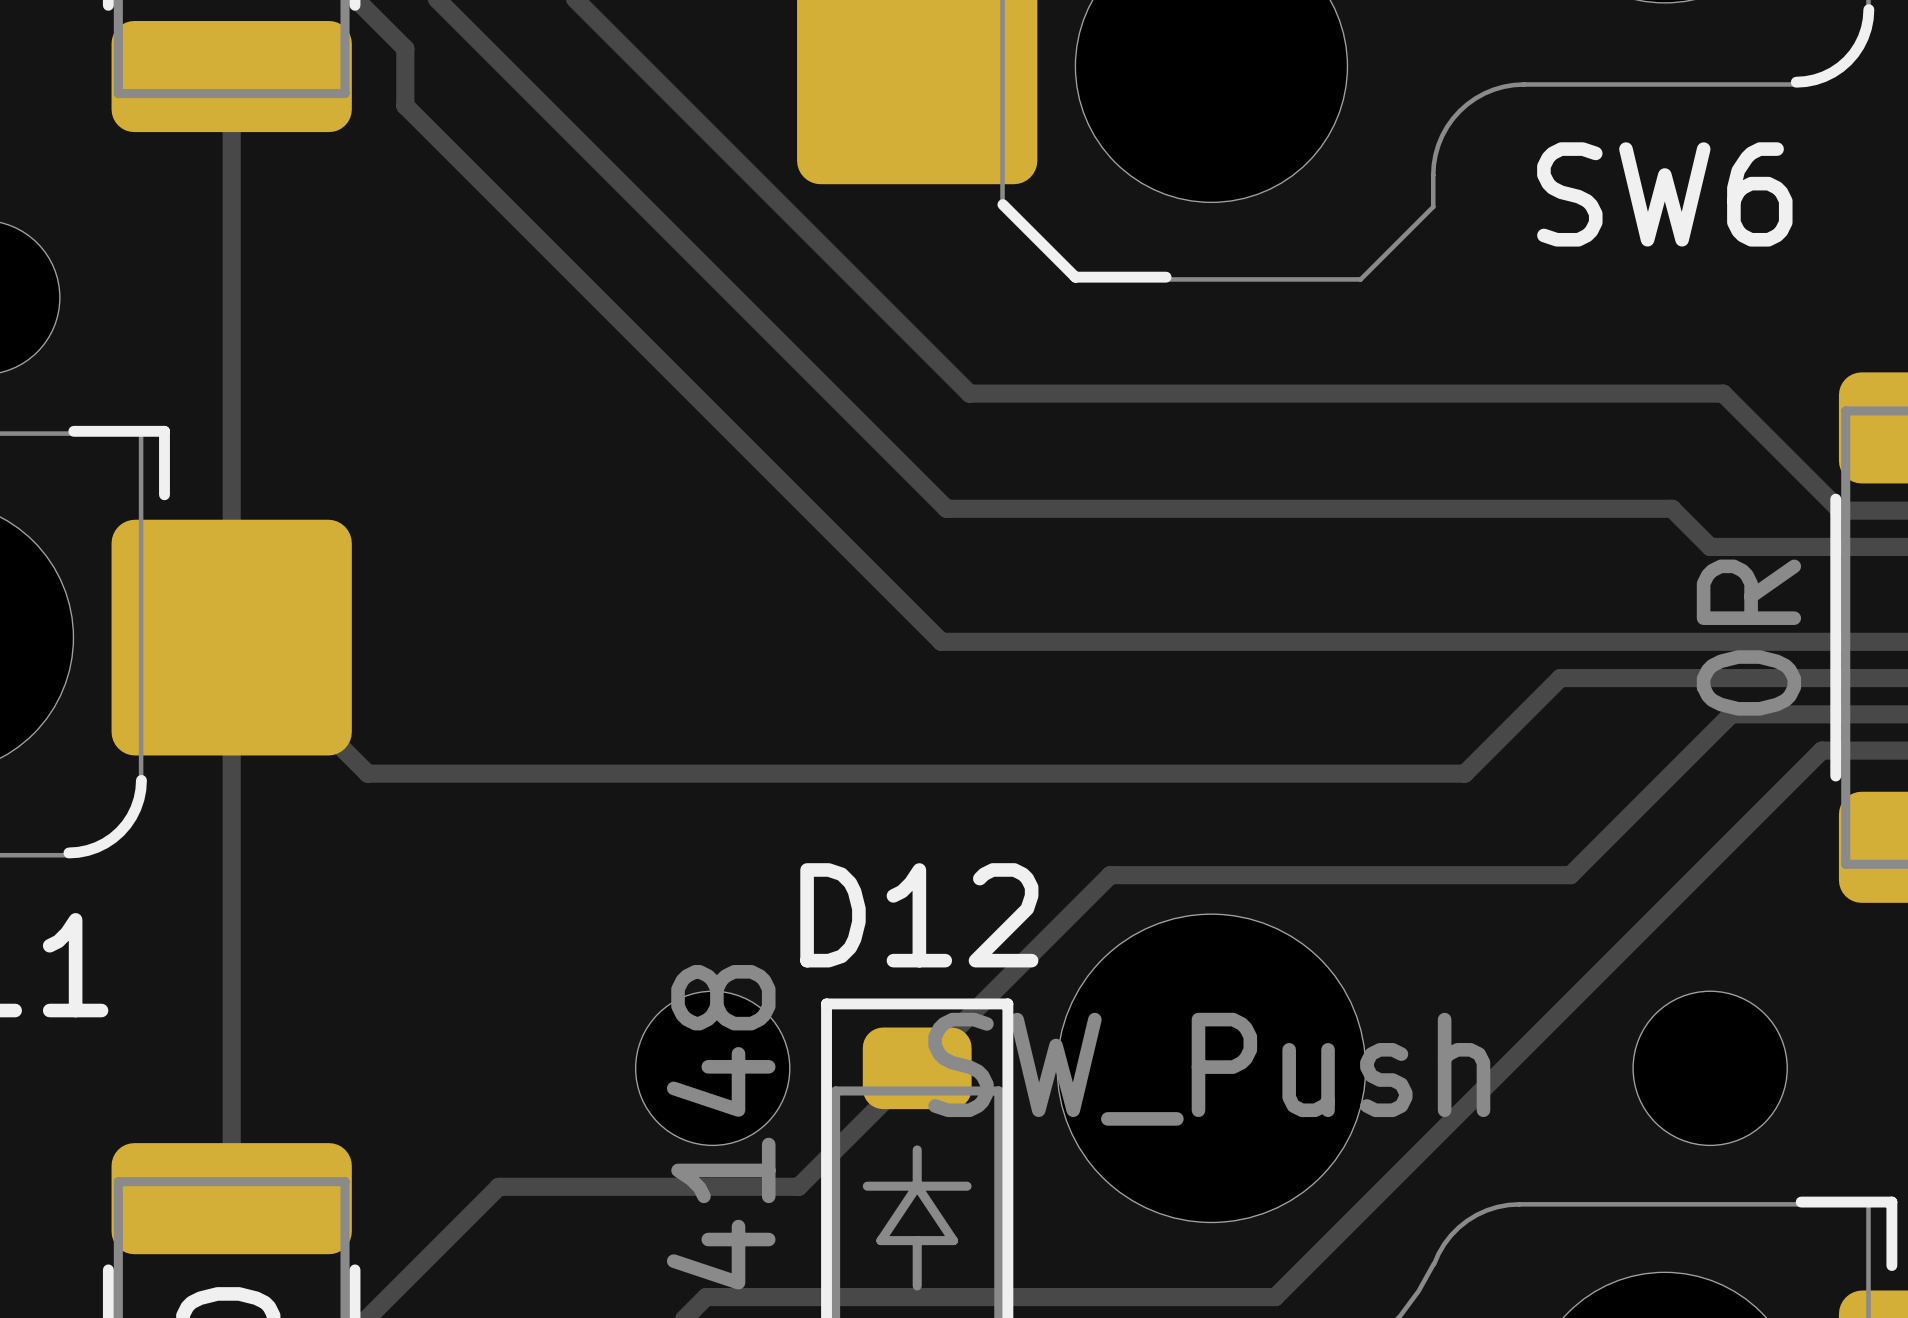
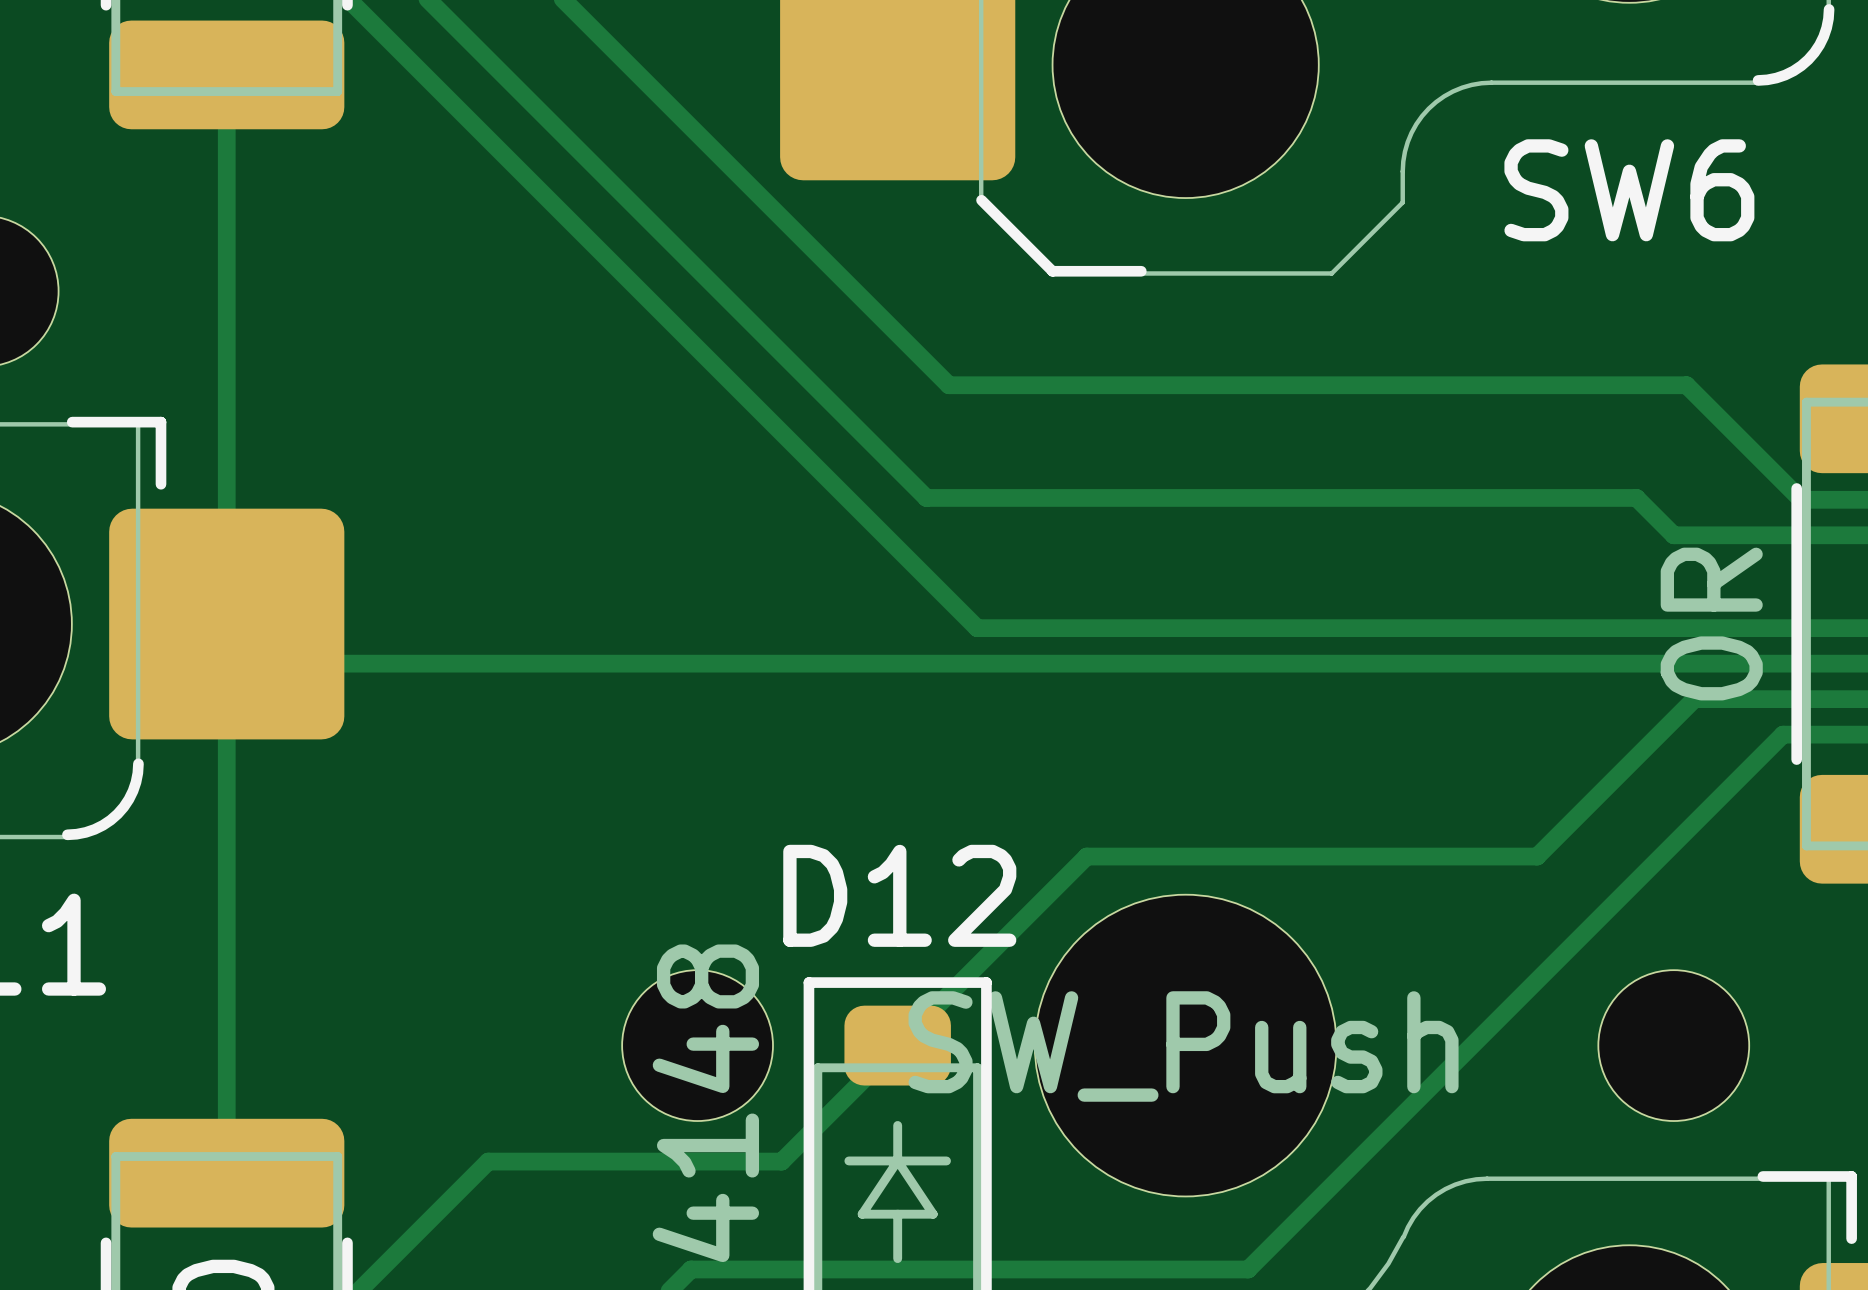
track: (405, 48) (405, 105) (941, 641) (998, 641) -> (396, 47) (977, 628)
track: (272, 678) (367, 773) (1464, 773) (1560, 678) -> (266, 663) (1527, 663)

